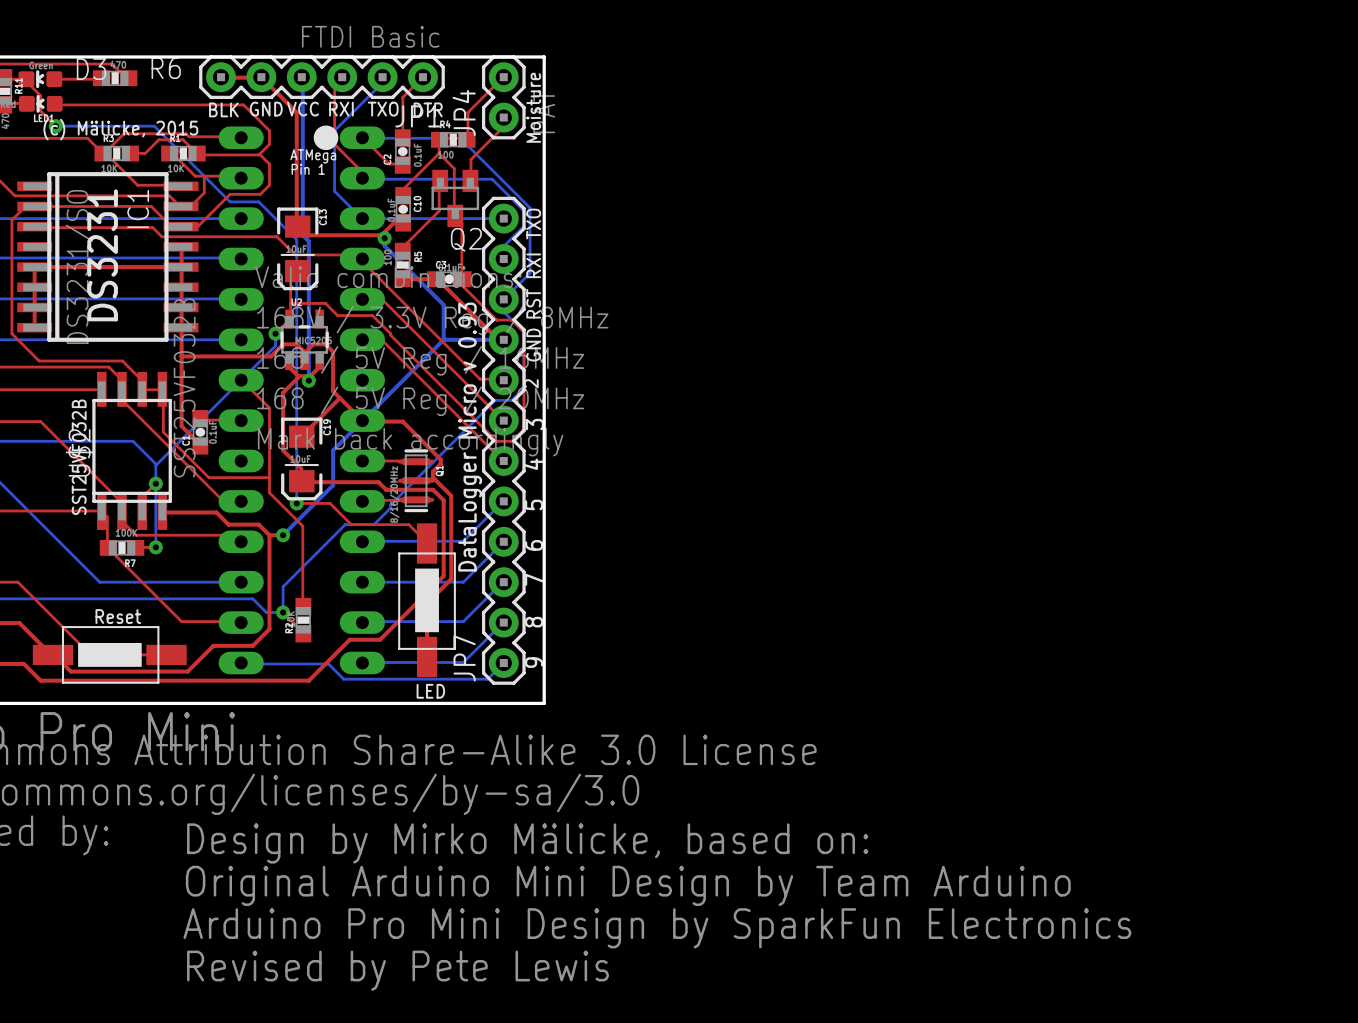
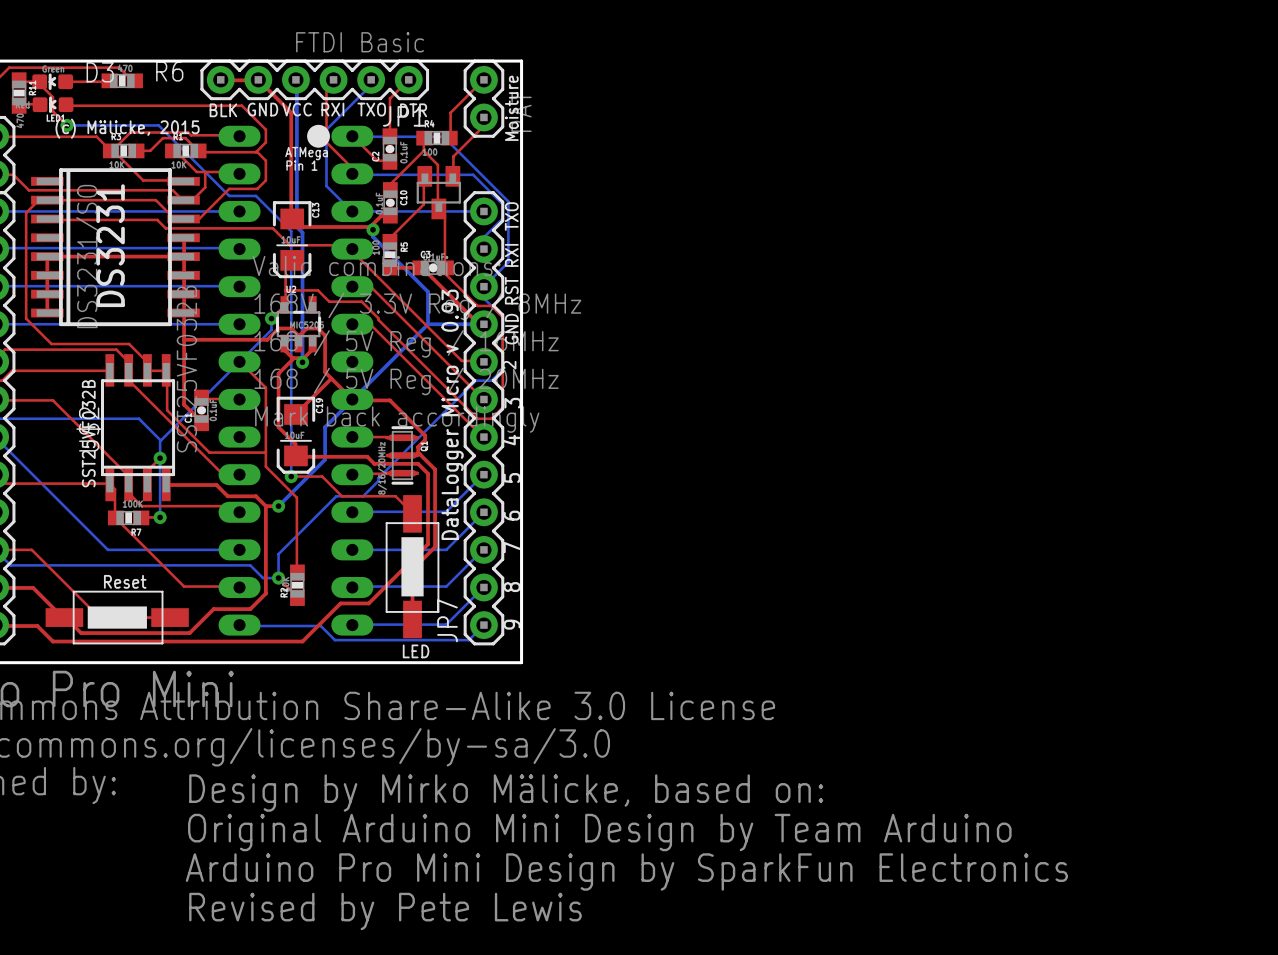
JP4 name: JP4 (464, 112) -> none
IC1 name: IC1 (138, 208) -> none
Q2 name: Q2 (466, 239) -> none

